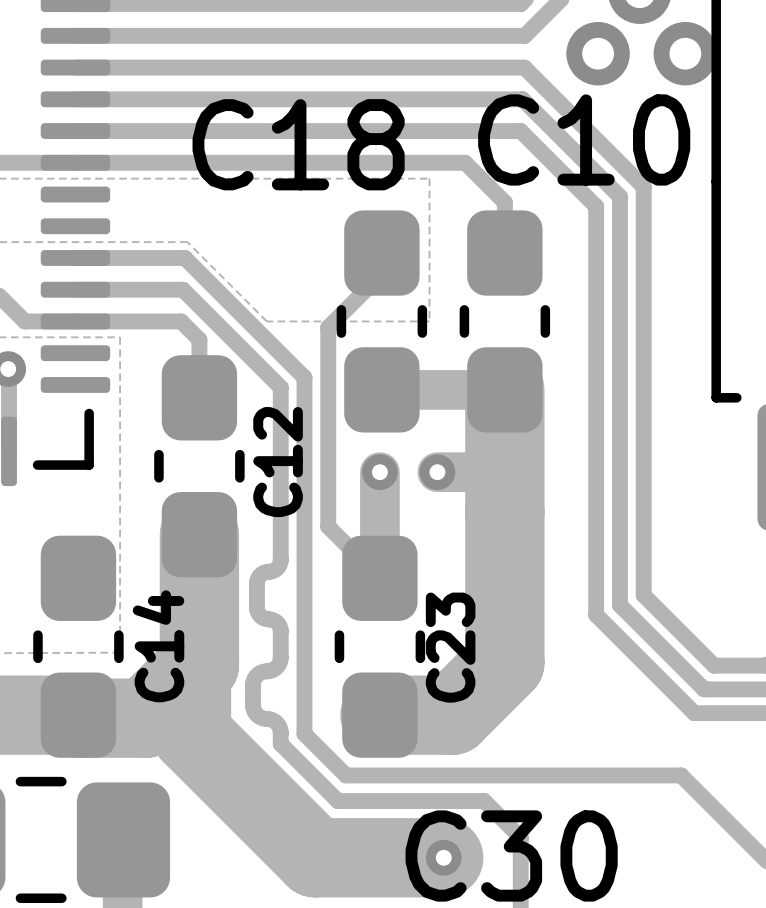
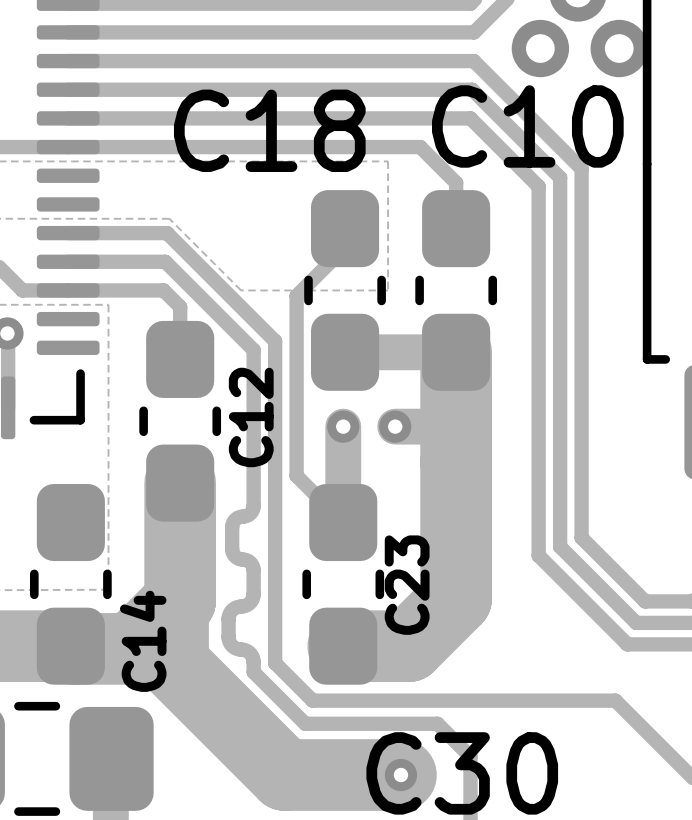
C14 name position: C14 (158, 646) -> C14 (143, 641)

